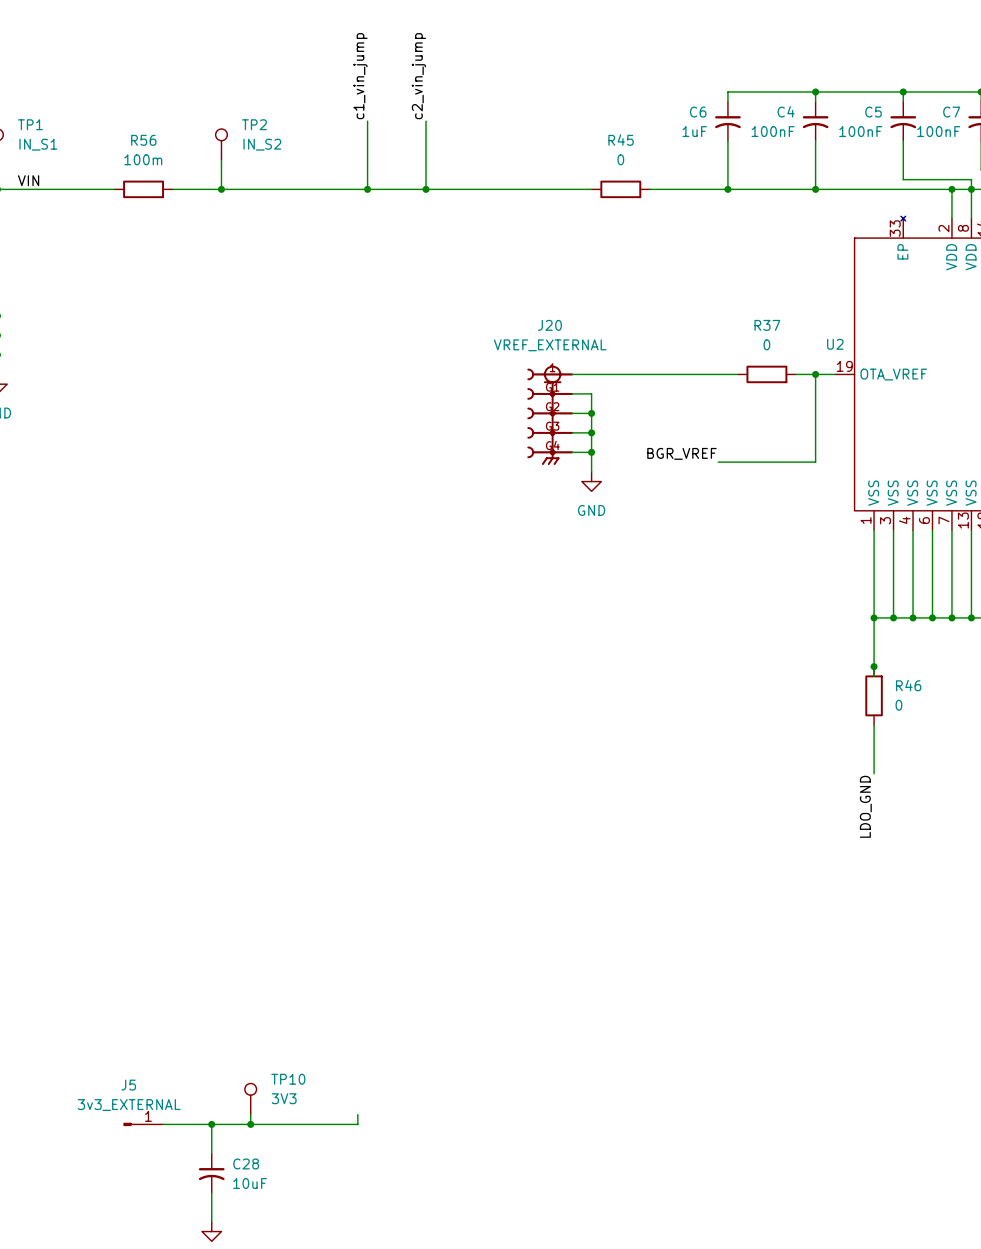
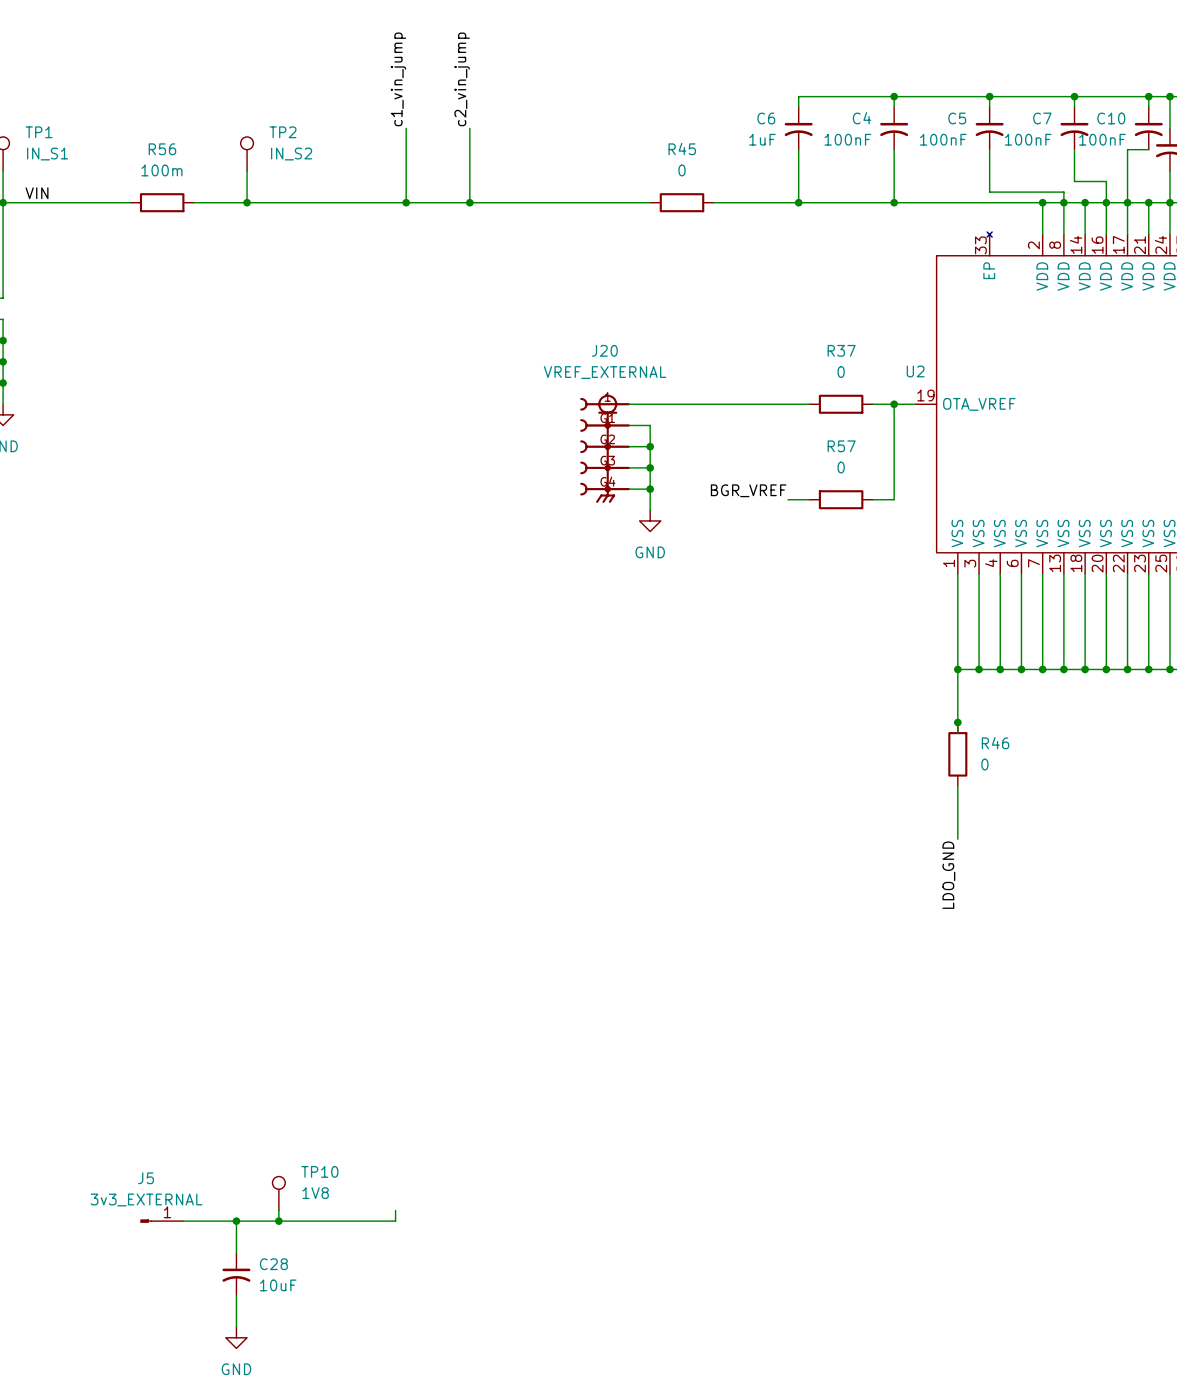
wire: (737, 462) (796, 462) -> none
R57: none -> 0 (841, 499)
TP10 value: 3V3 (284, 1098) -> 1V8 (315, 1193)

